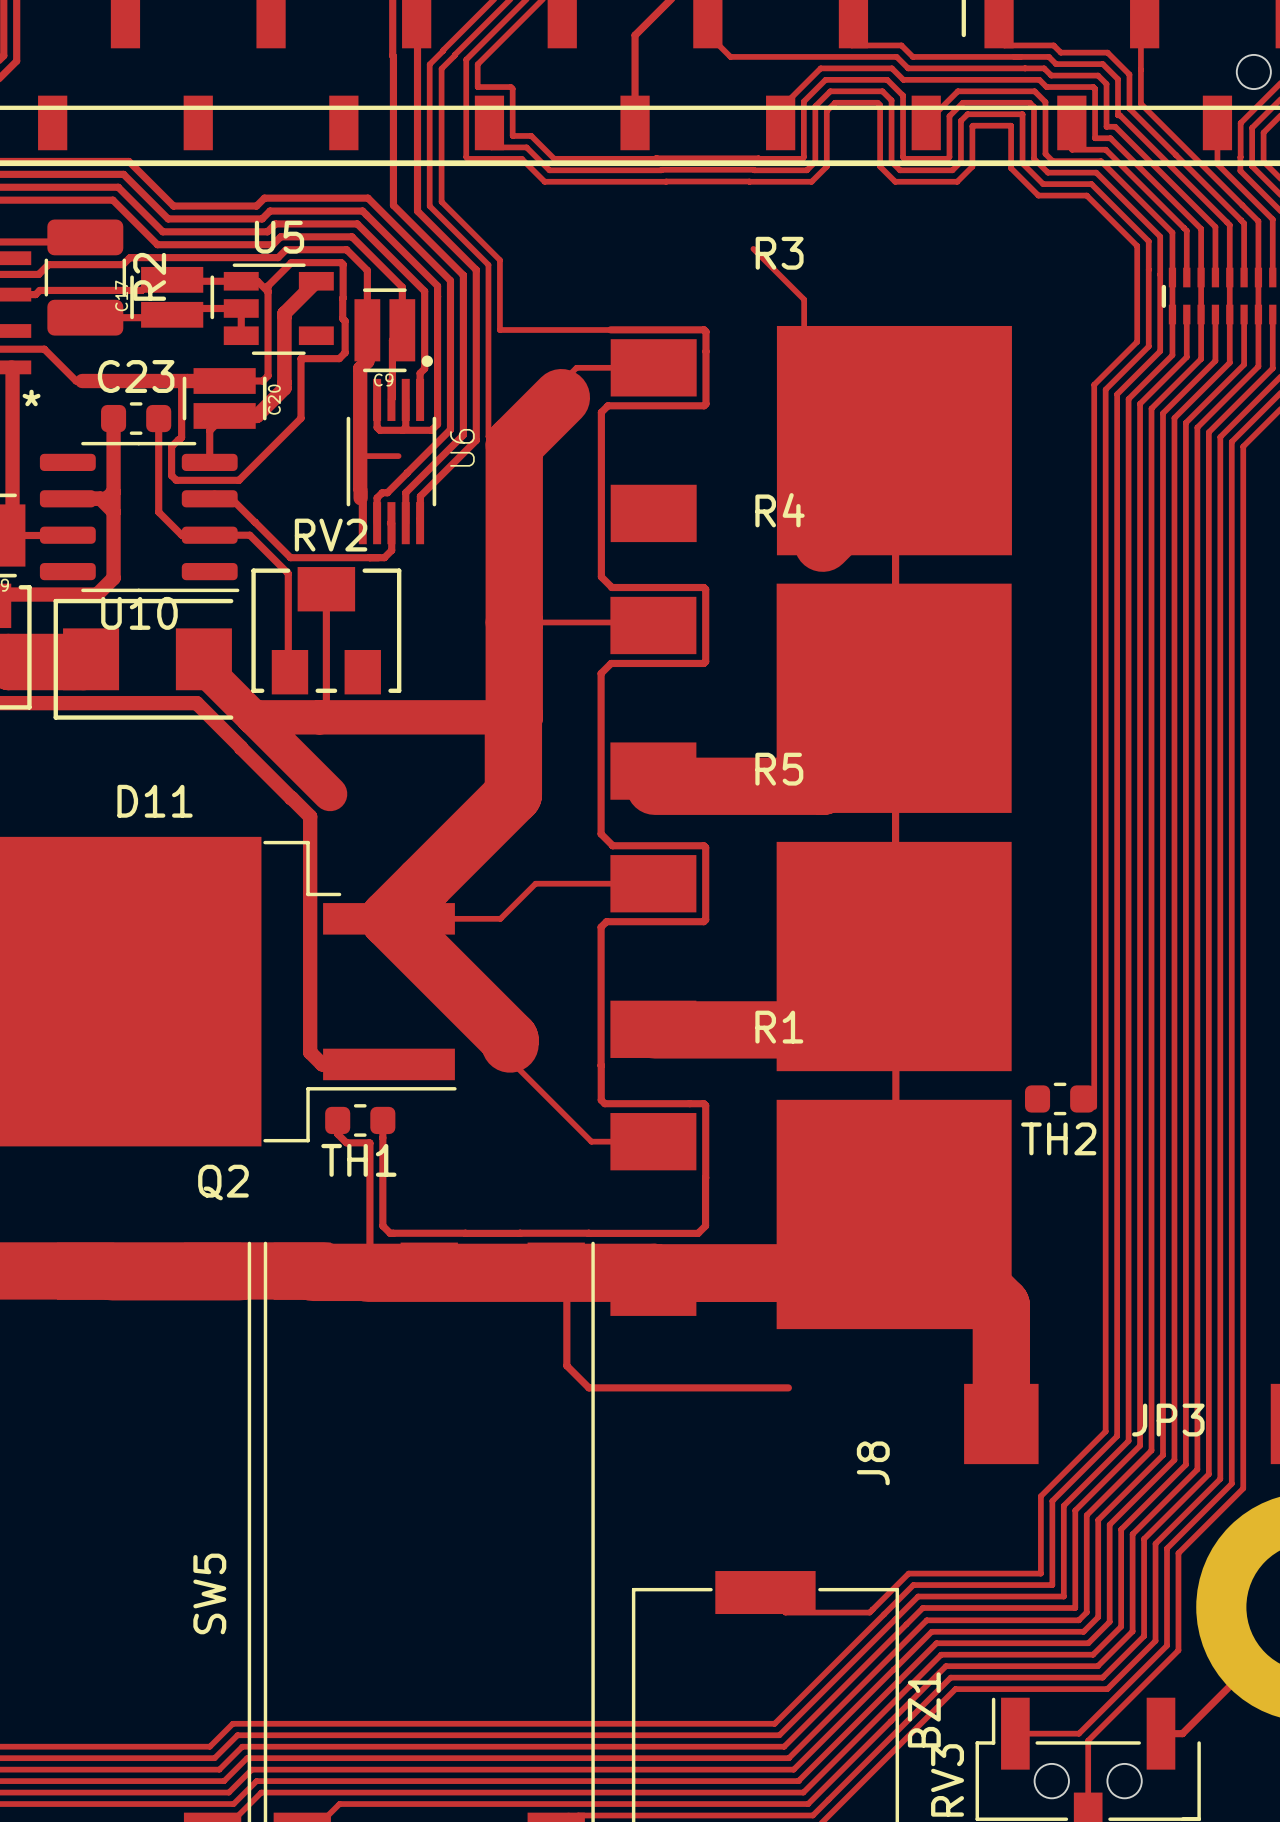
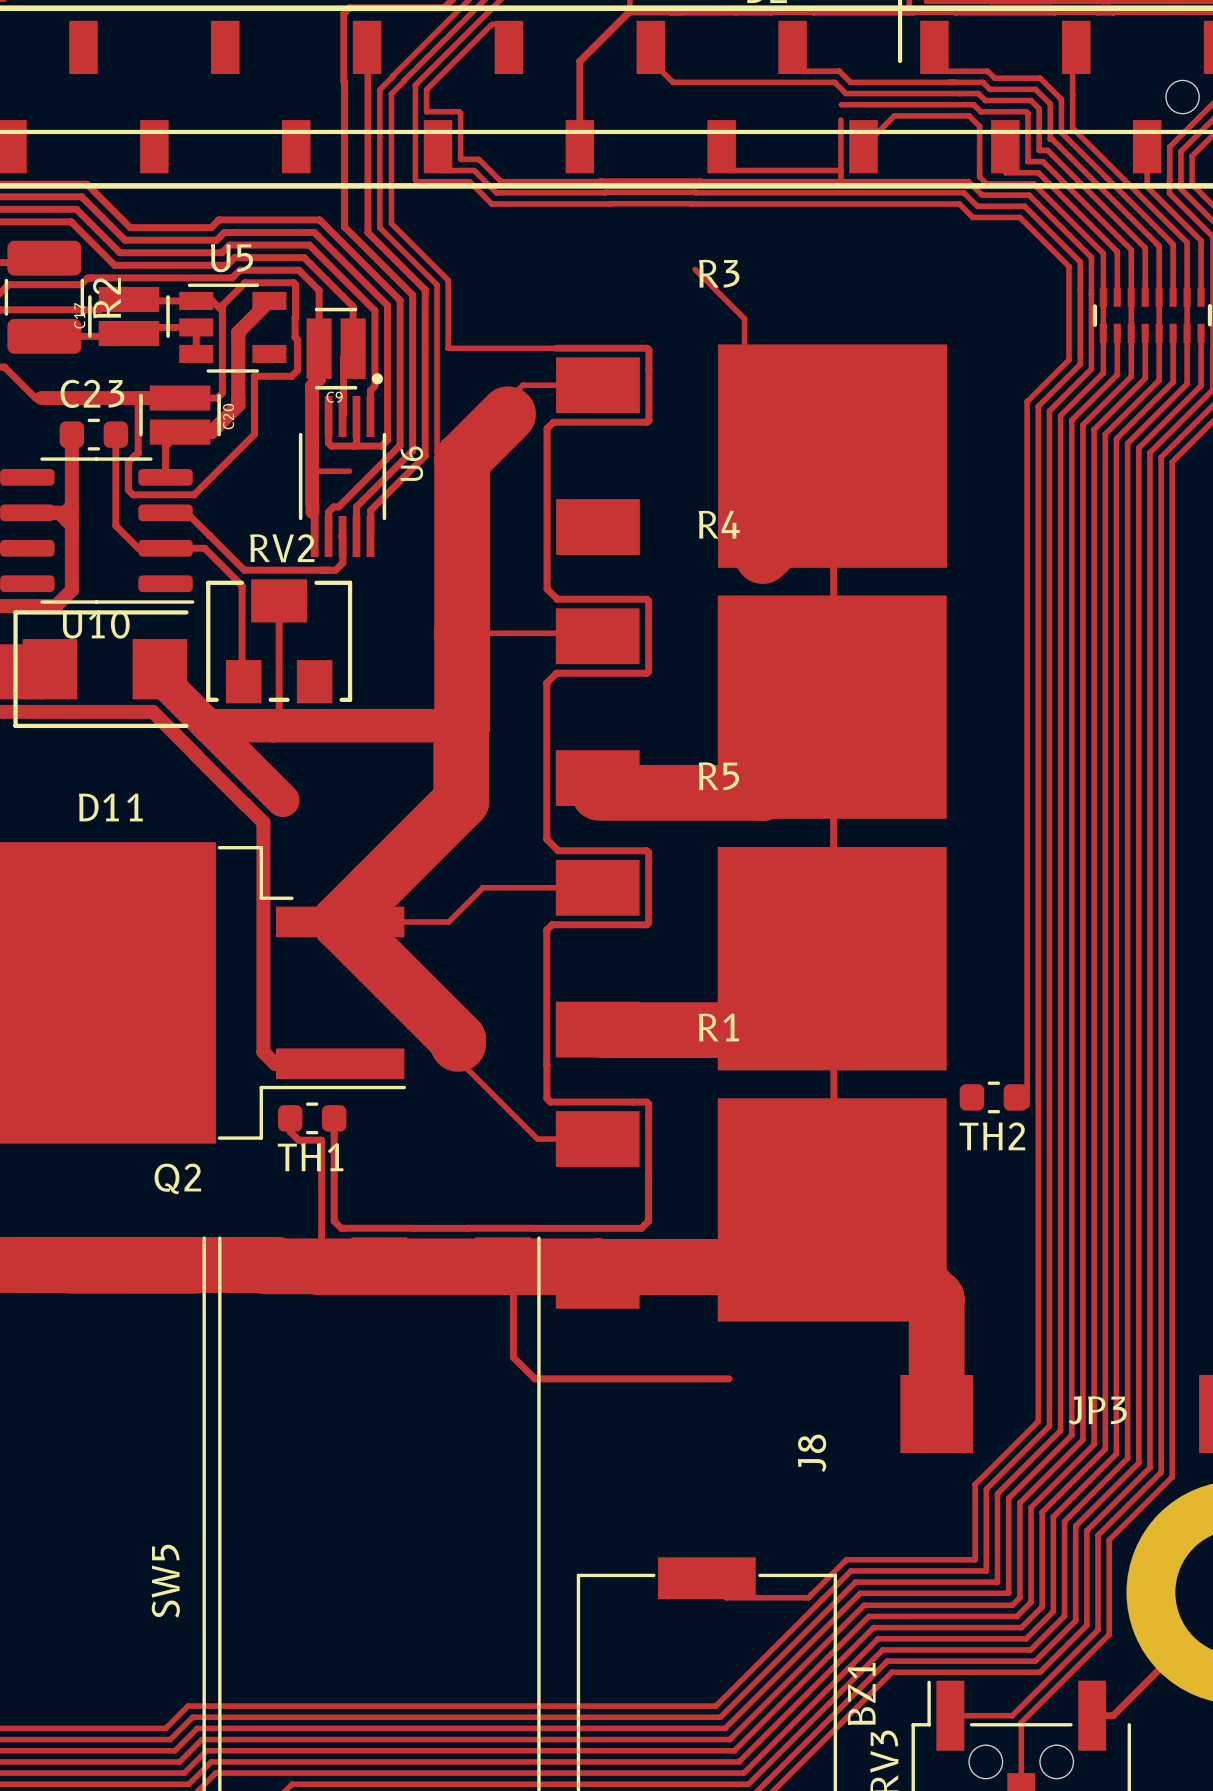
track: (903, 79) (891, 68) (820, 68) (780, 108) (780, 122) -> (840, 170) (729, 170) (729, 154) (721, 146)
track: (902, 95) (887, 79) (825, 79) (803, 101) (803, 157) (802, 158) -> (842, 181) (742, 181)
track: (1022, 114) (967, 114) (960, 120) (960, 161) (952, 170) -> (963, 192) (889, 192)
track: (1022, 114) (1022, 163) (1029, 170) -> none
track: (1010, 125) (972, 126) (972, 166) (957, 181) -> (959, 203) (893, 203)
track: (1011, 125) (1011, 168) (1024, 181) -> none
track: (1034, 158) (1034, 107) (1029, 102) (962, 102) (949, 116) (949, 157) (947, 158) -> (968, 181) (884, 181)
track: (806, 170) (815, 161) (815, 106) (830, 91) (882, 91) (891, 100) (891, 161) (900, 170) -> (747, 192) (837, 192)
track: (811, 181) (826, 166) (826, 111) (835, 102) (877, 102) (880, 105) (880, 166) (895, 181) -> (751, 203) (833, 203)

